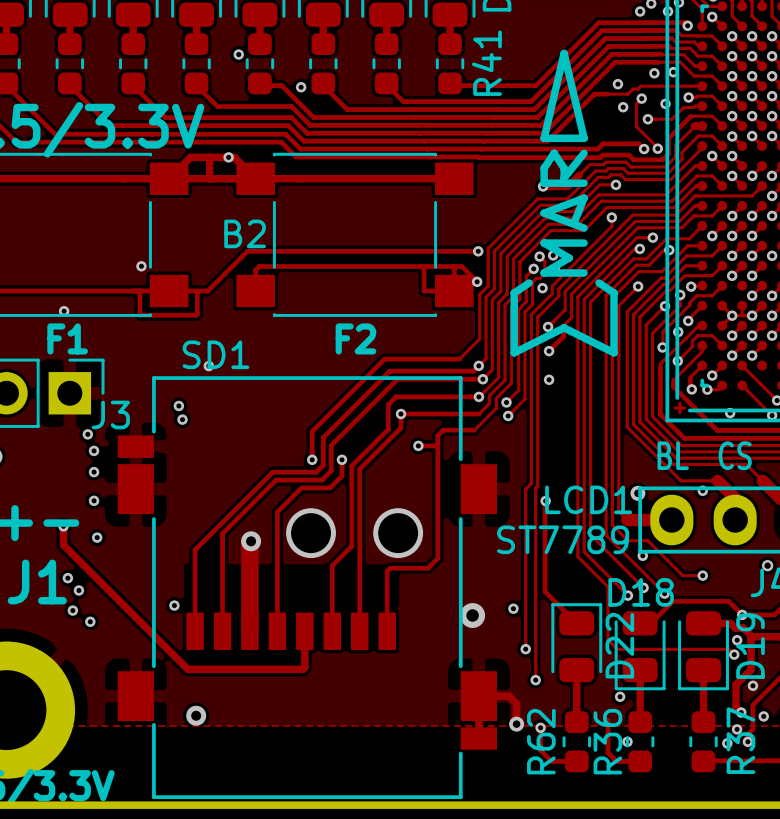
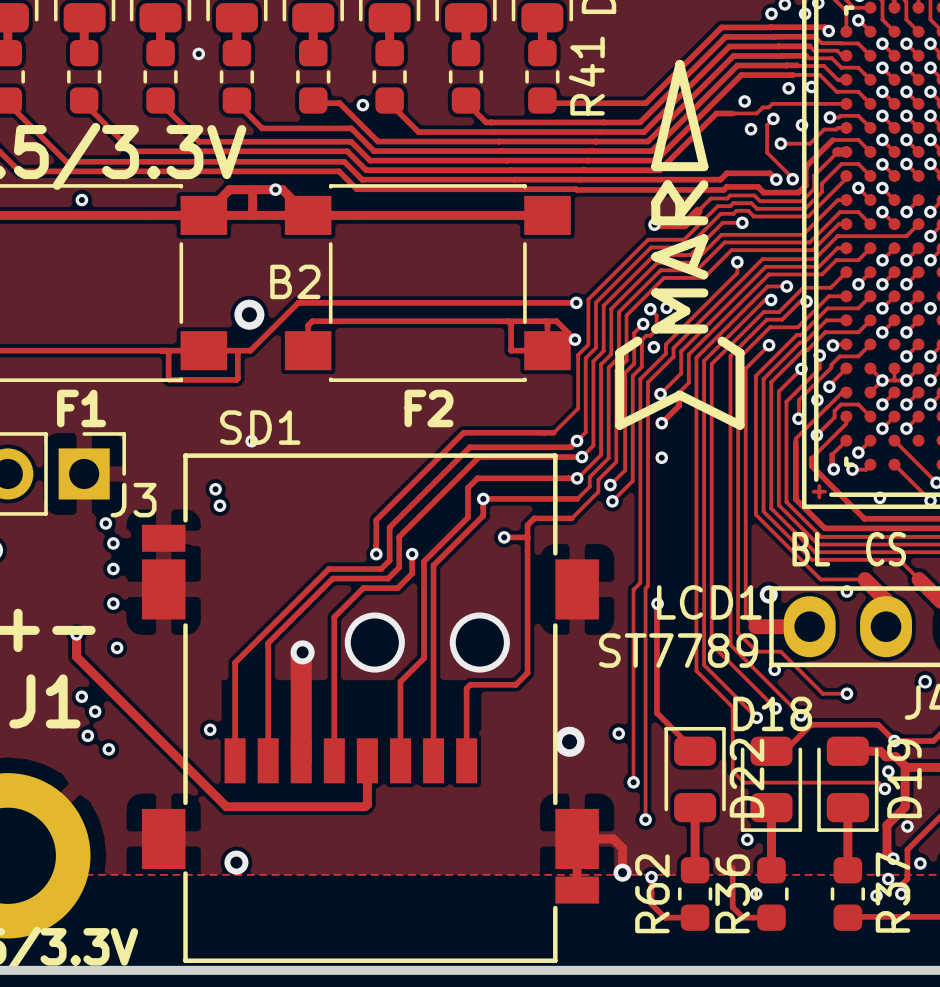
via position: (238, 54) -> (198, 53)
via: none -> (81, 200)
via: none -> (249, 314)
via: (141, 266) -> none
via: (64, 311) -> none

